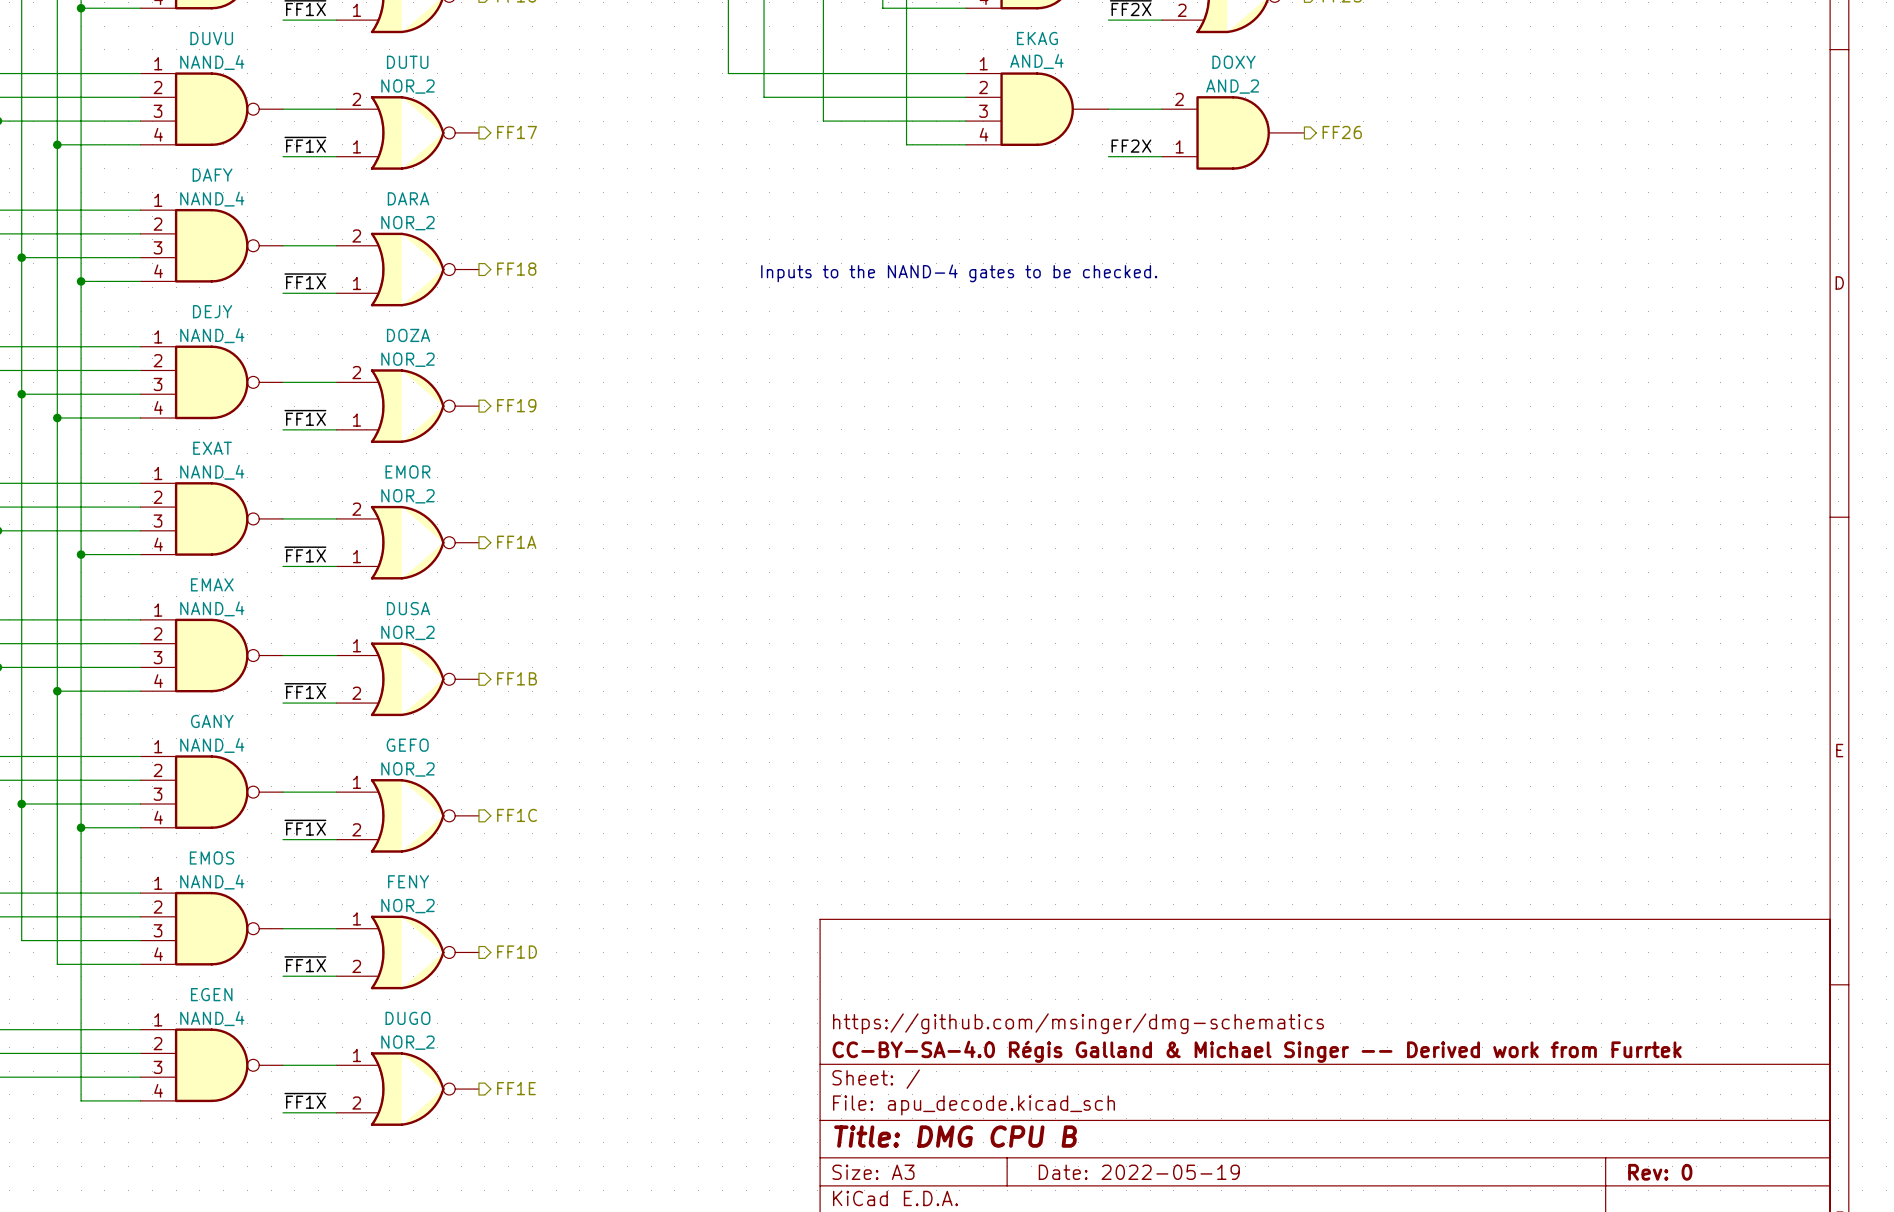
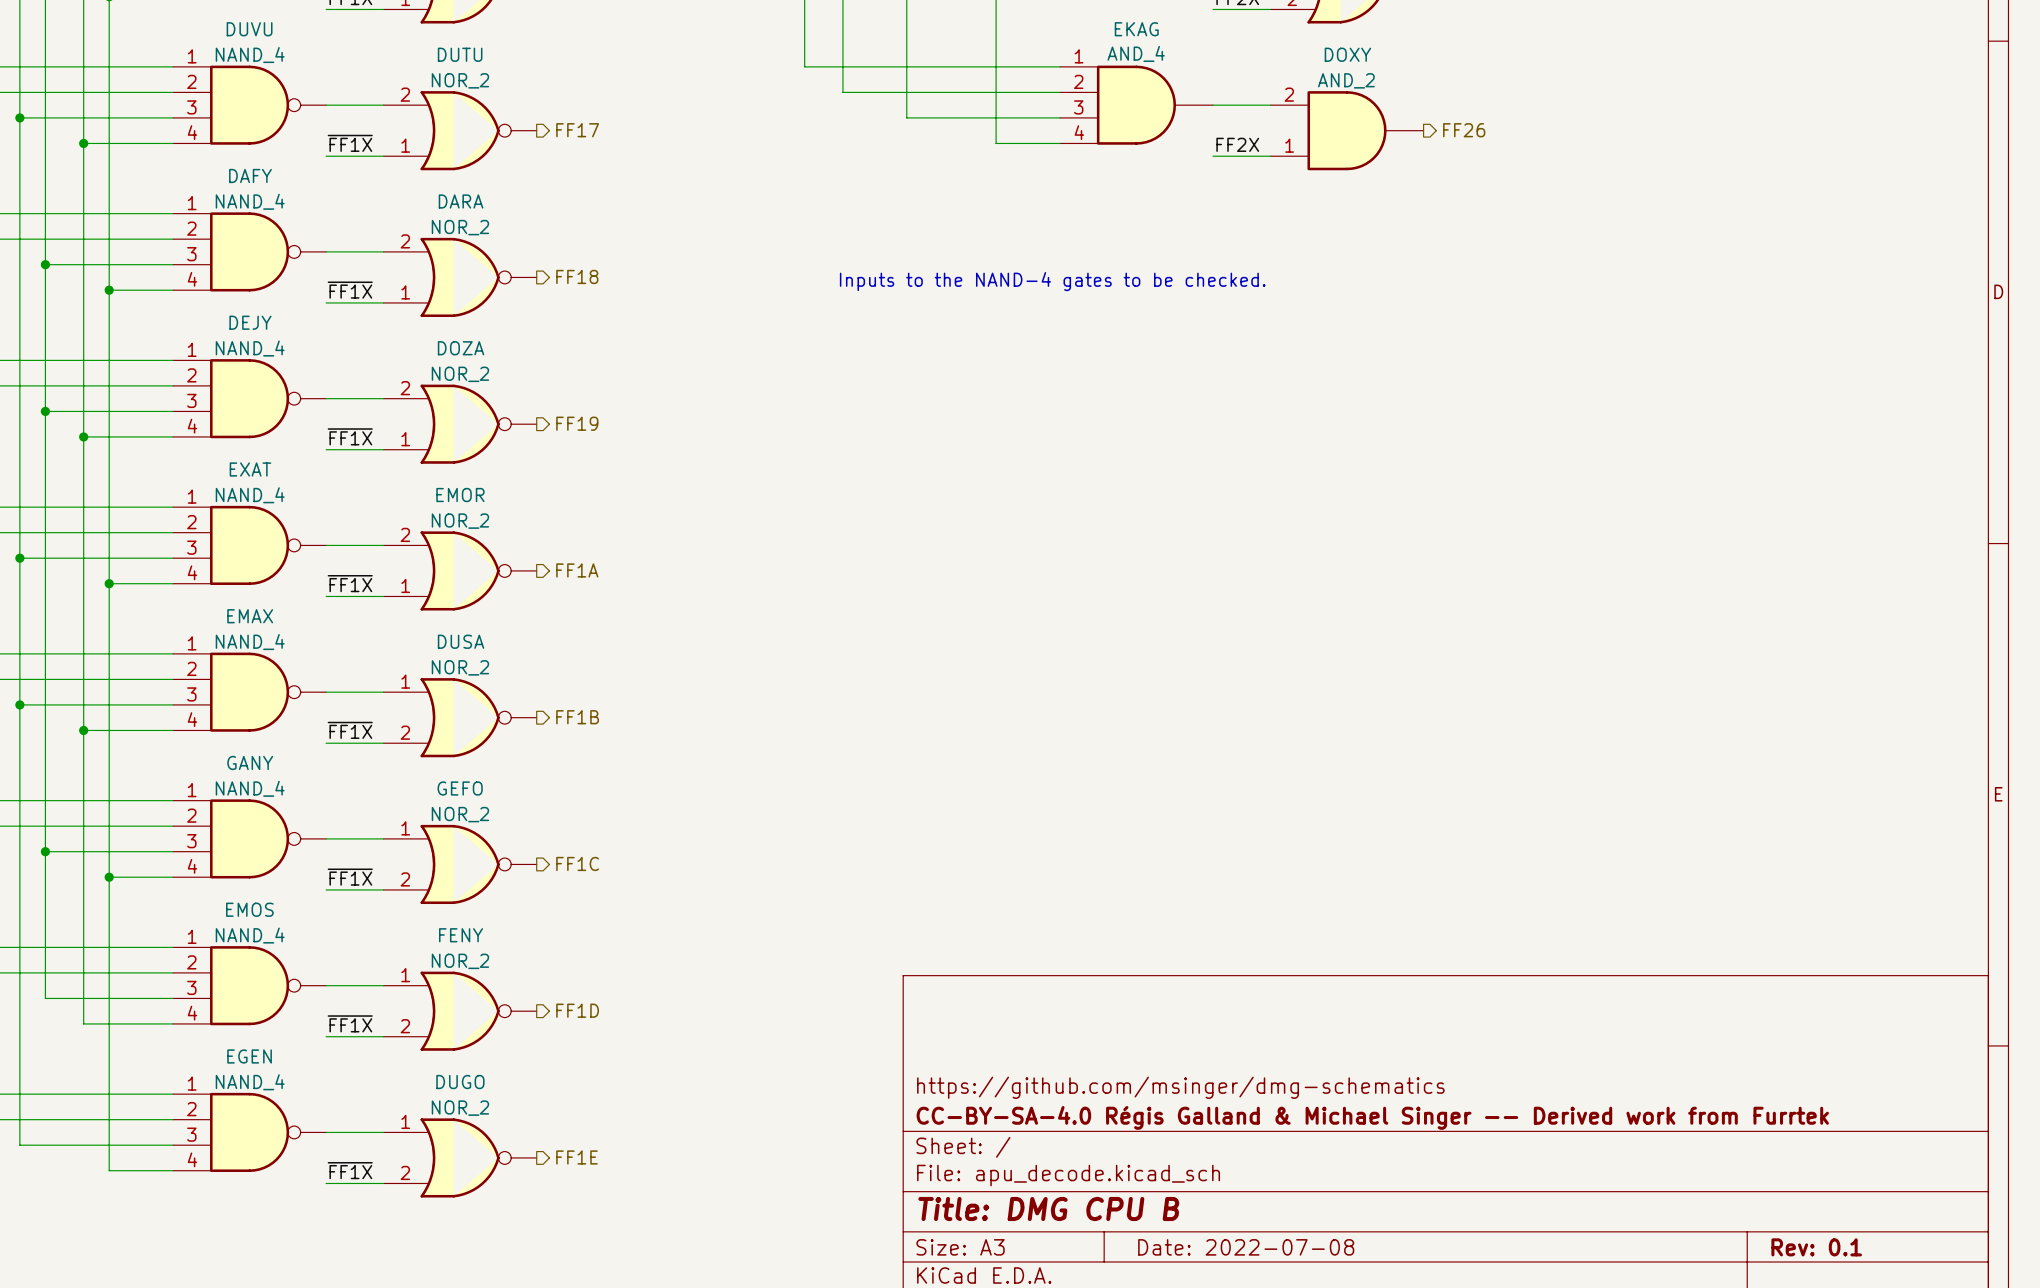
title block: Date: 2022-05-19 (1139, 1172) -> Date: 2022-07-08 (1246, 1247)
title block: Rev: 0 (1660, 1172) -> Rev: 0.1 (1816, 1247)

